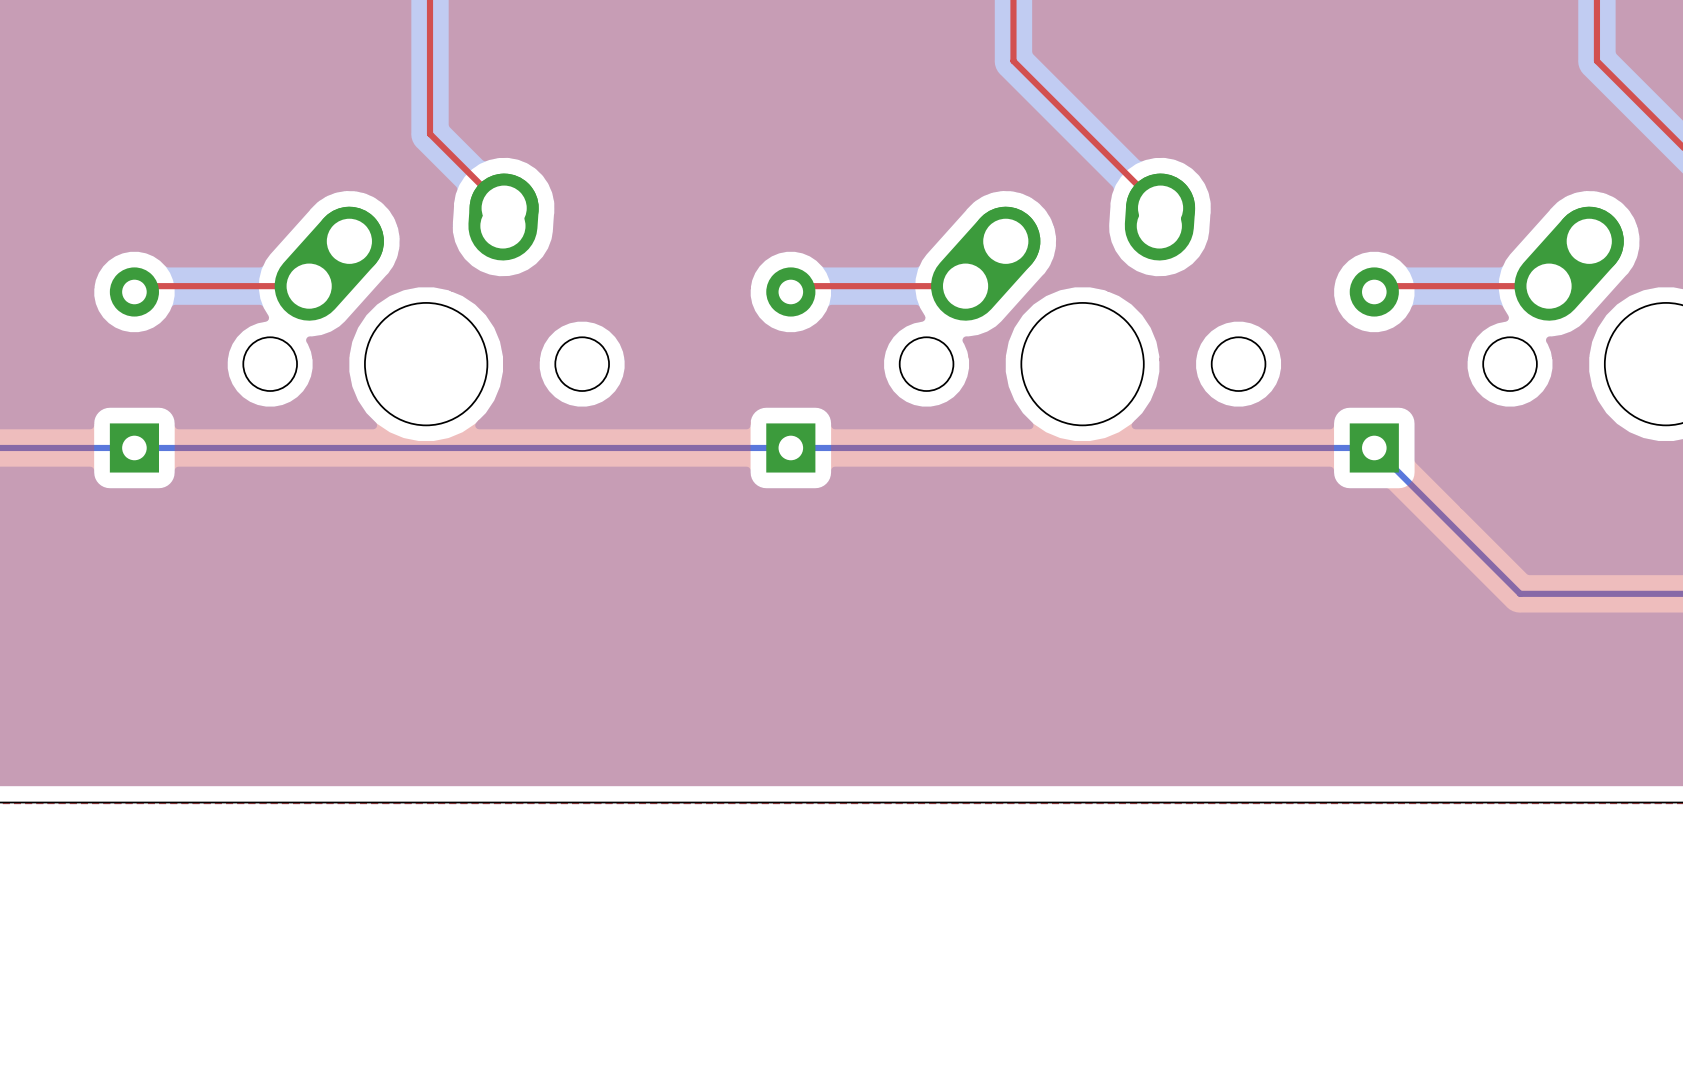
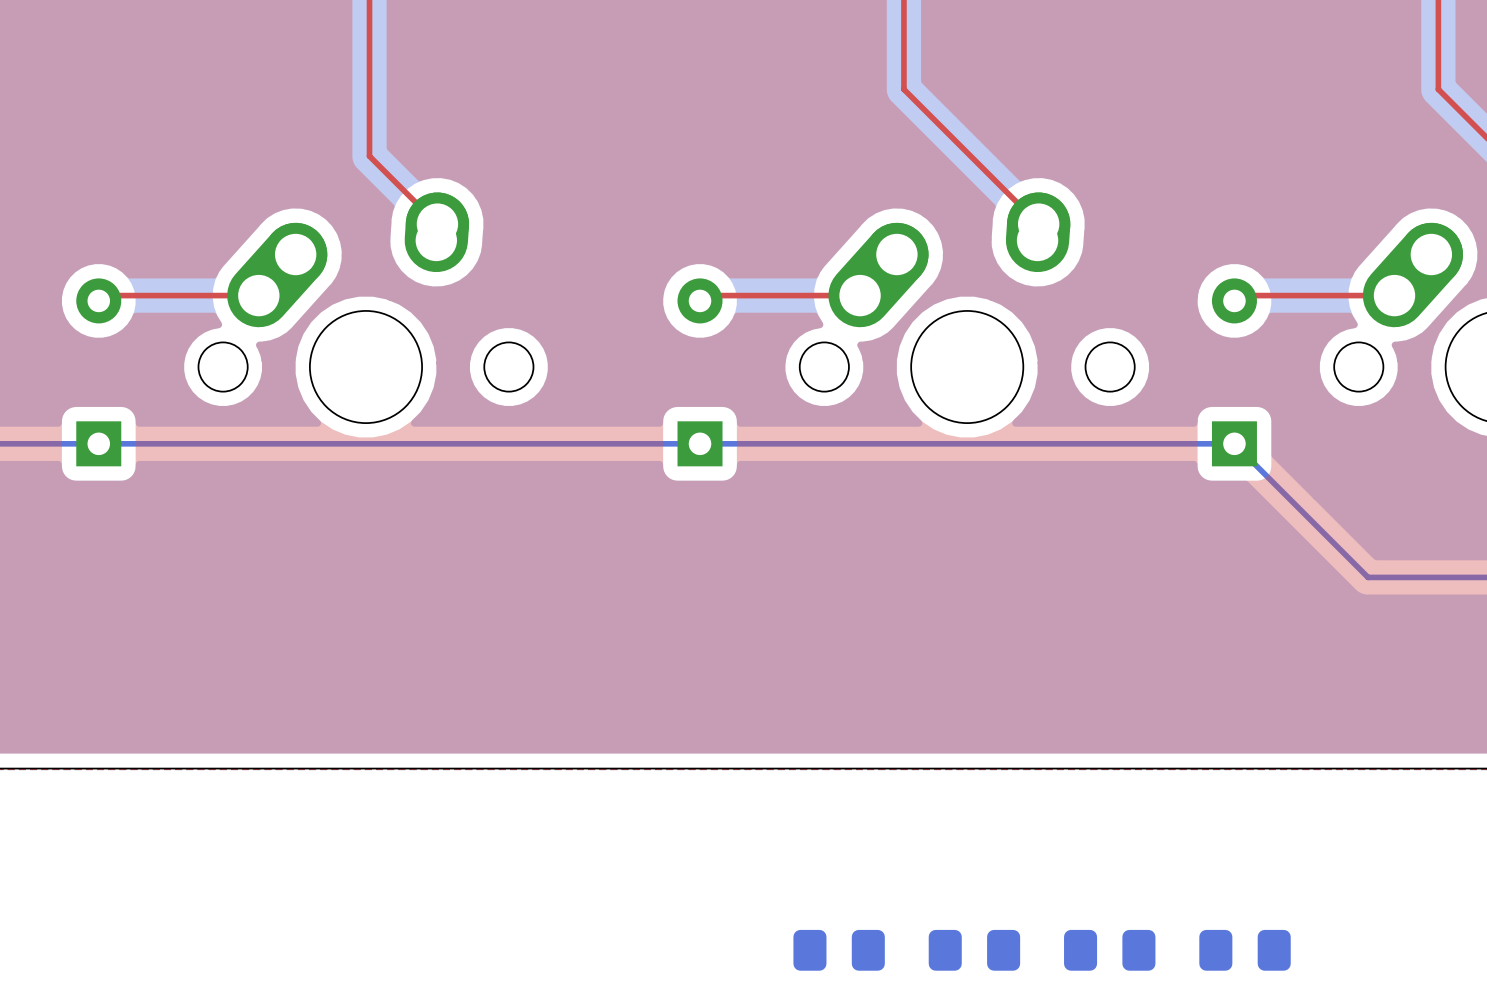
part: none -> (839, 950)
part: none -> (974, 950)
part: none -> (1109, 950)
part: none -> (1245, 950)

